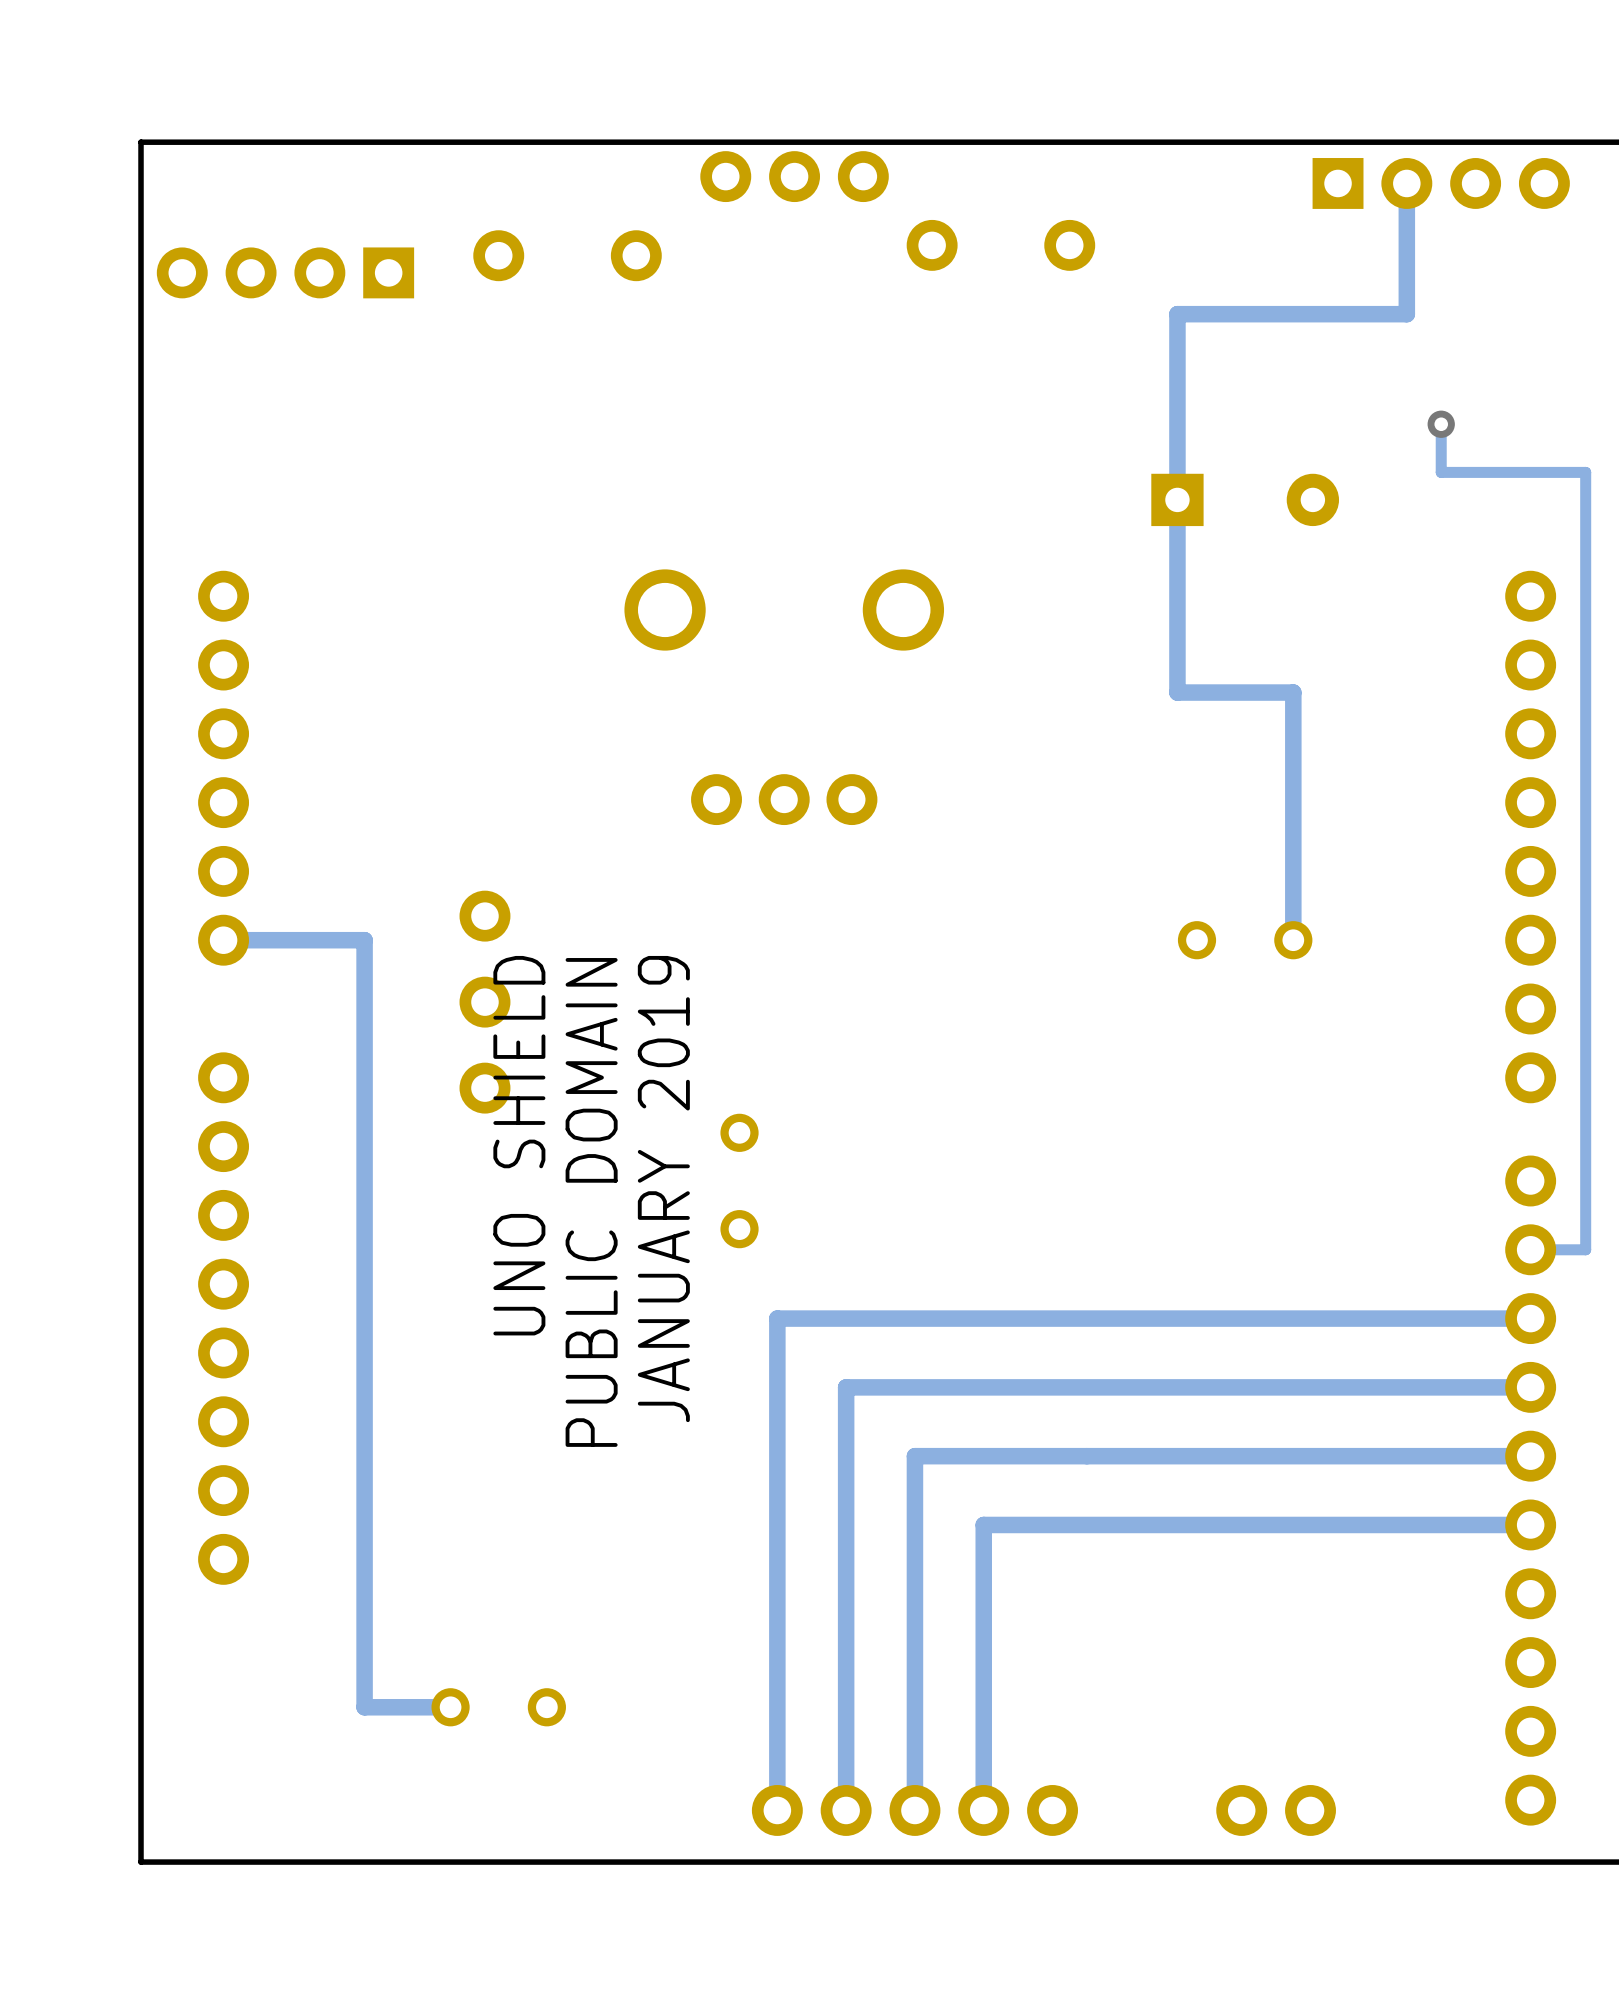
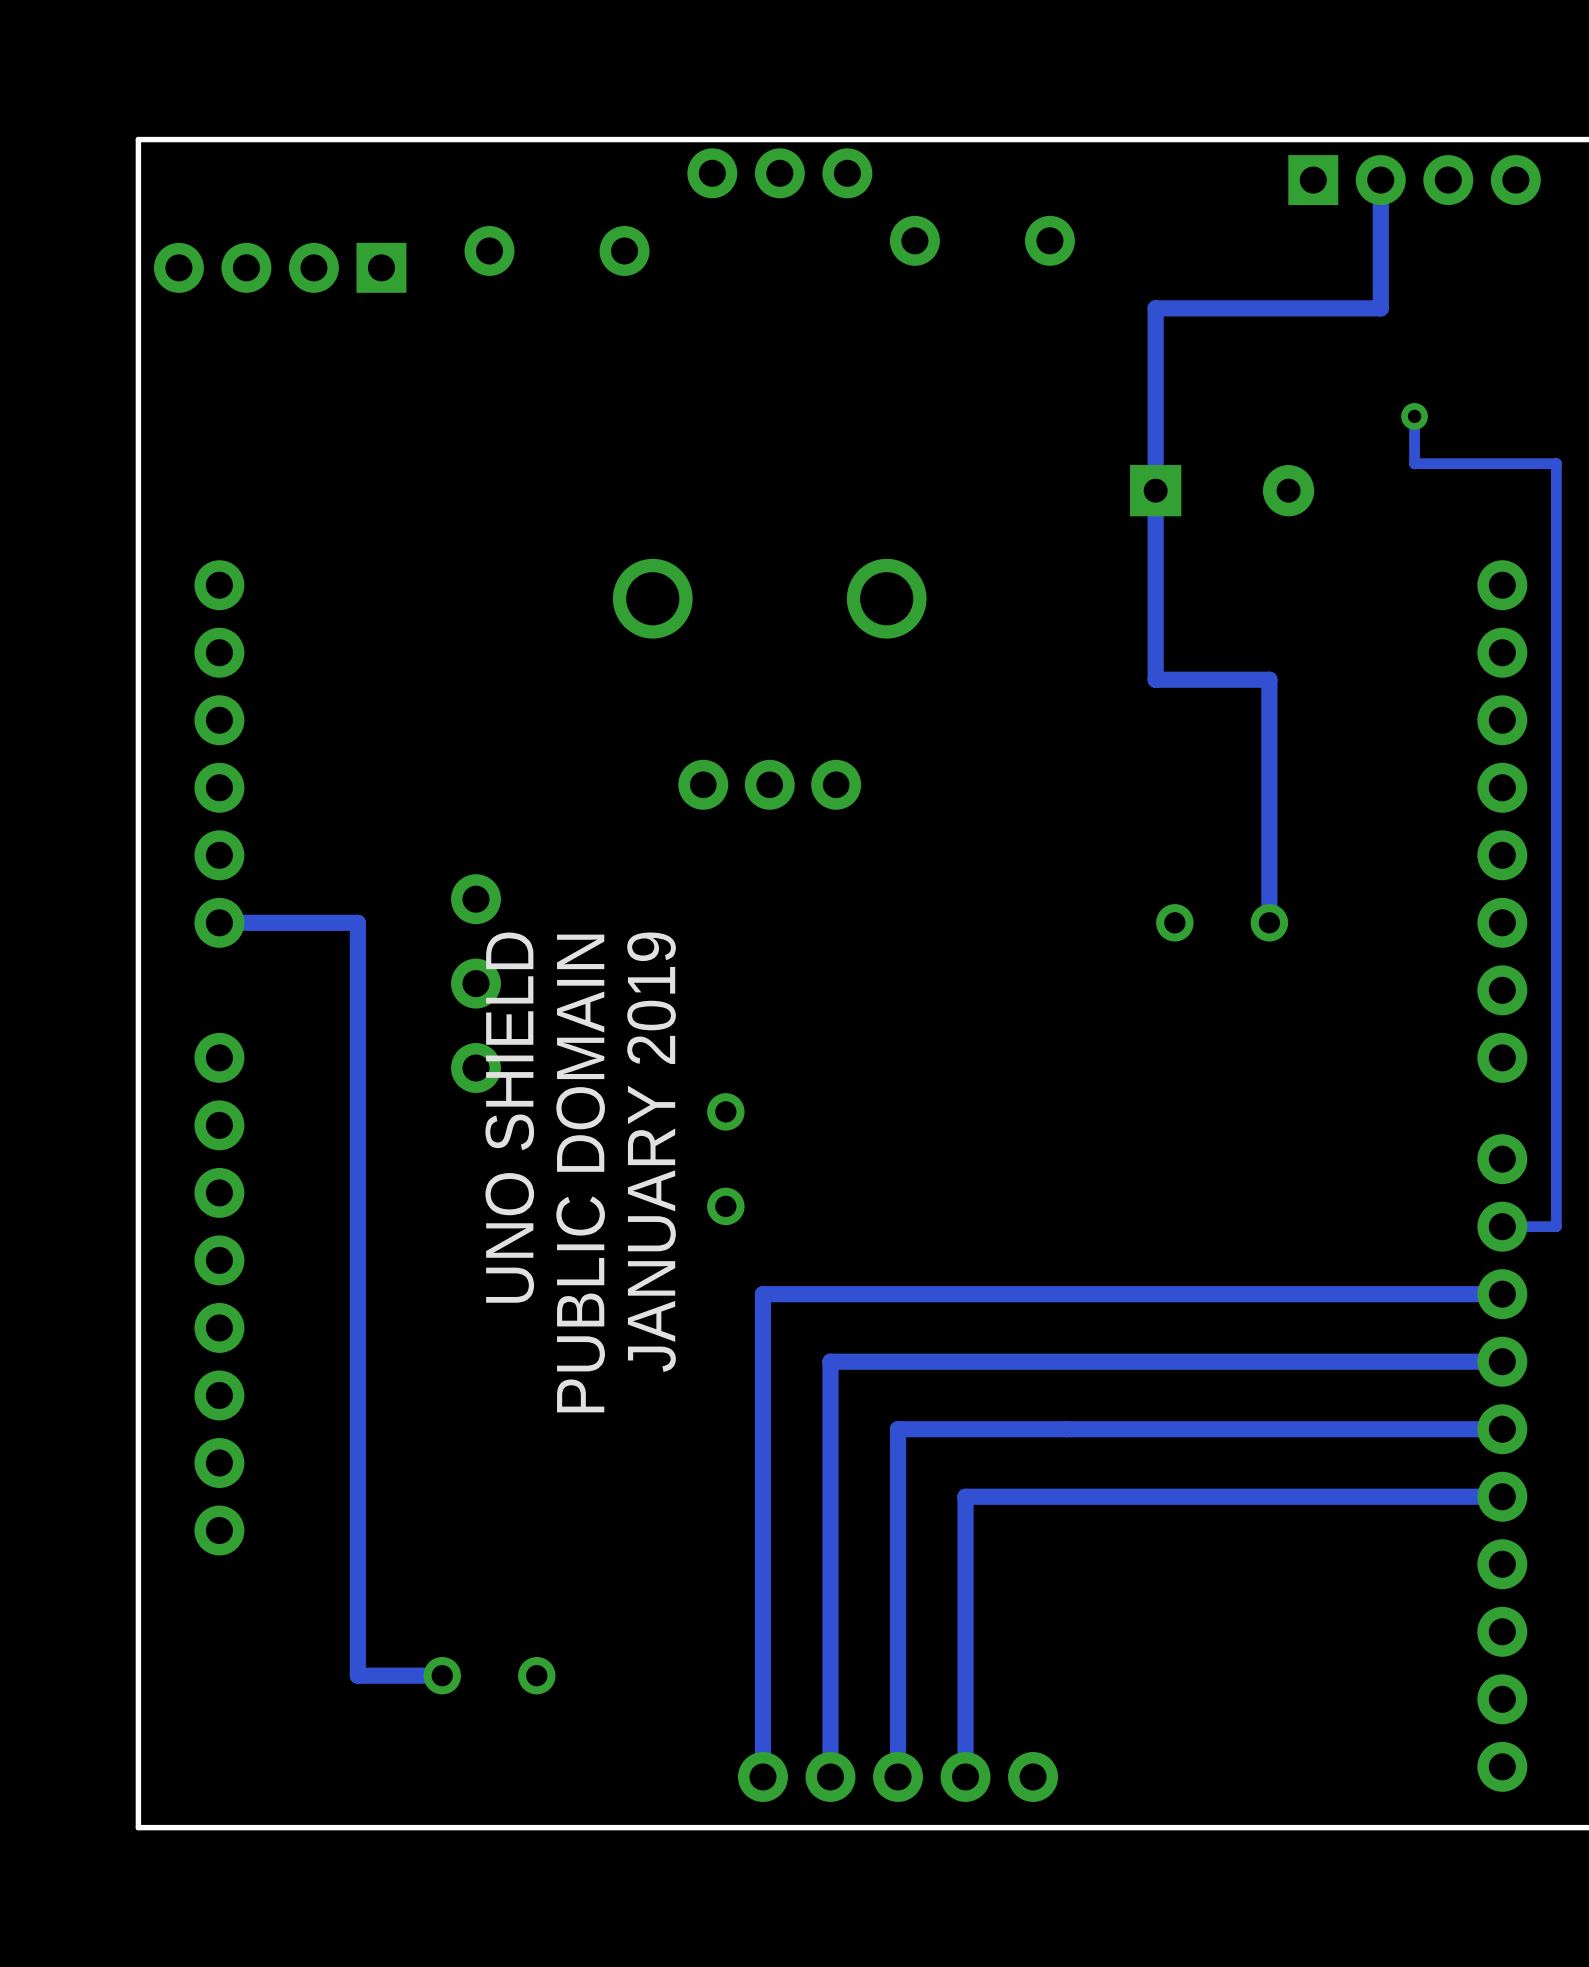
part: (1276, 1810) -> none

